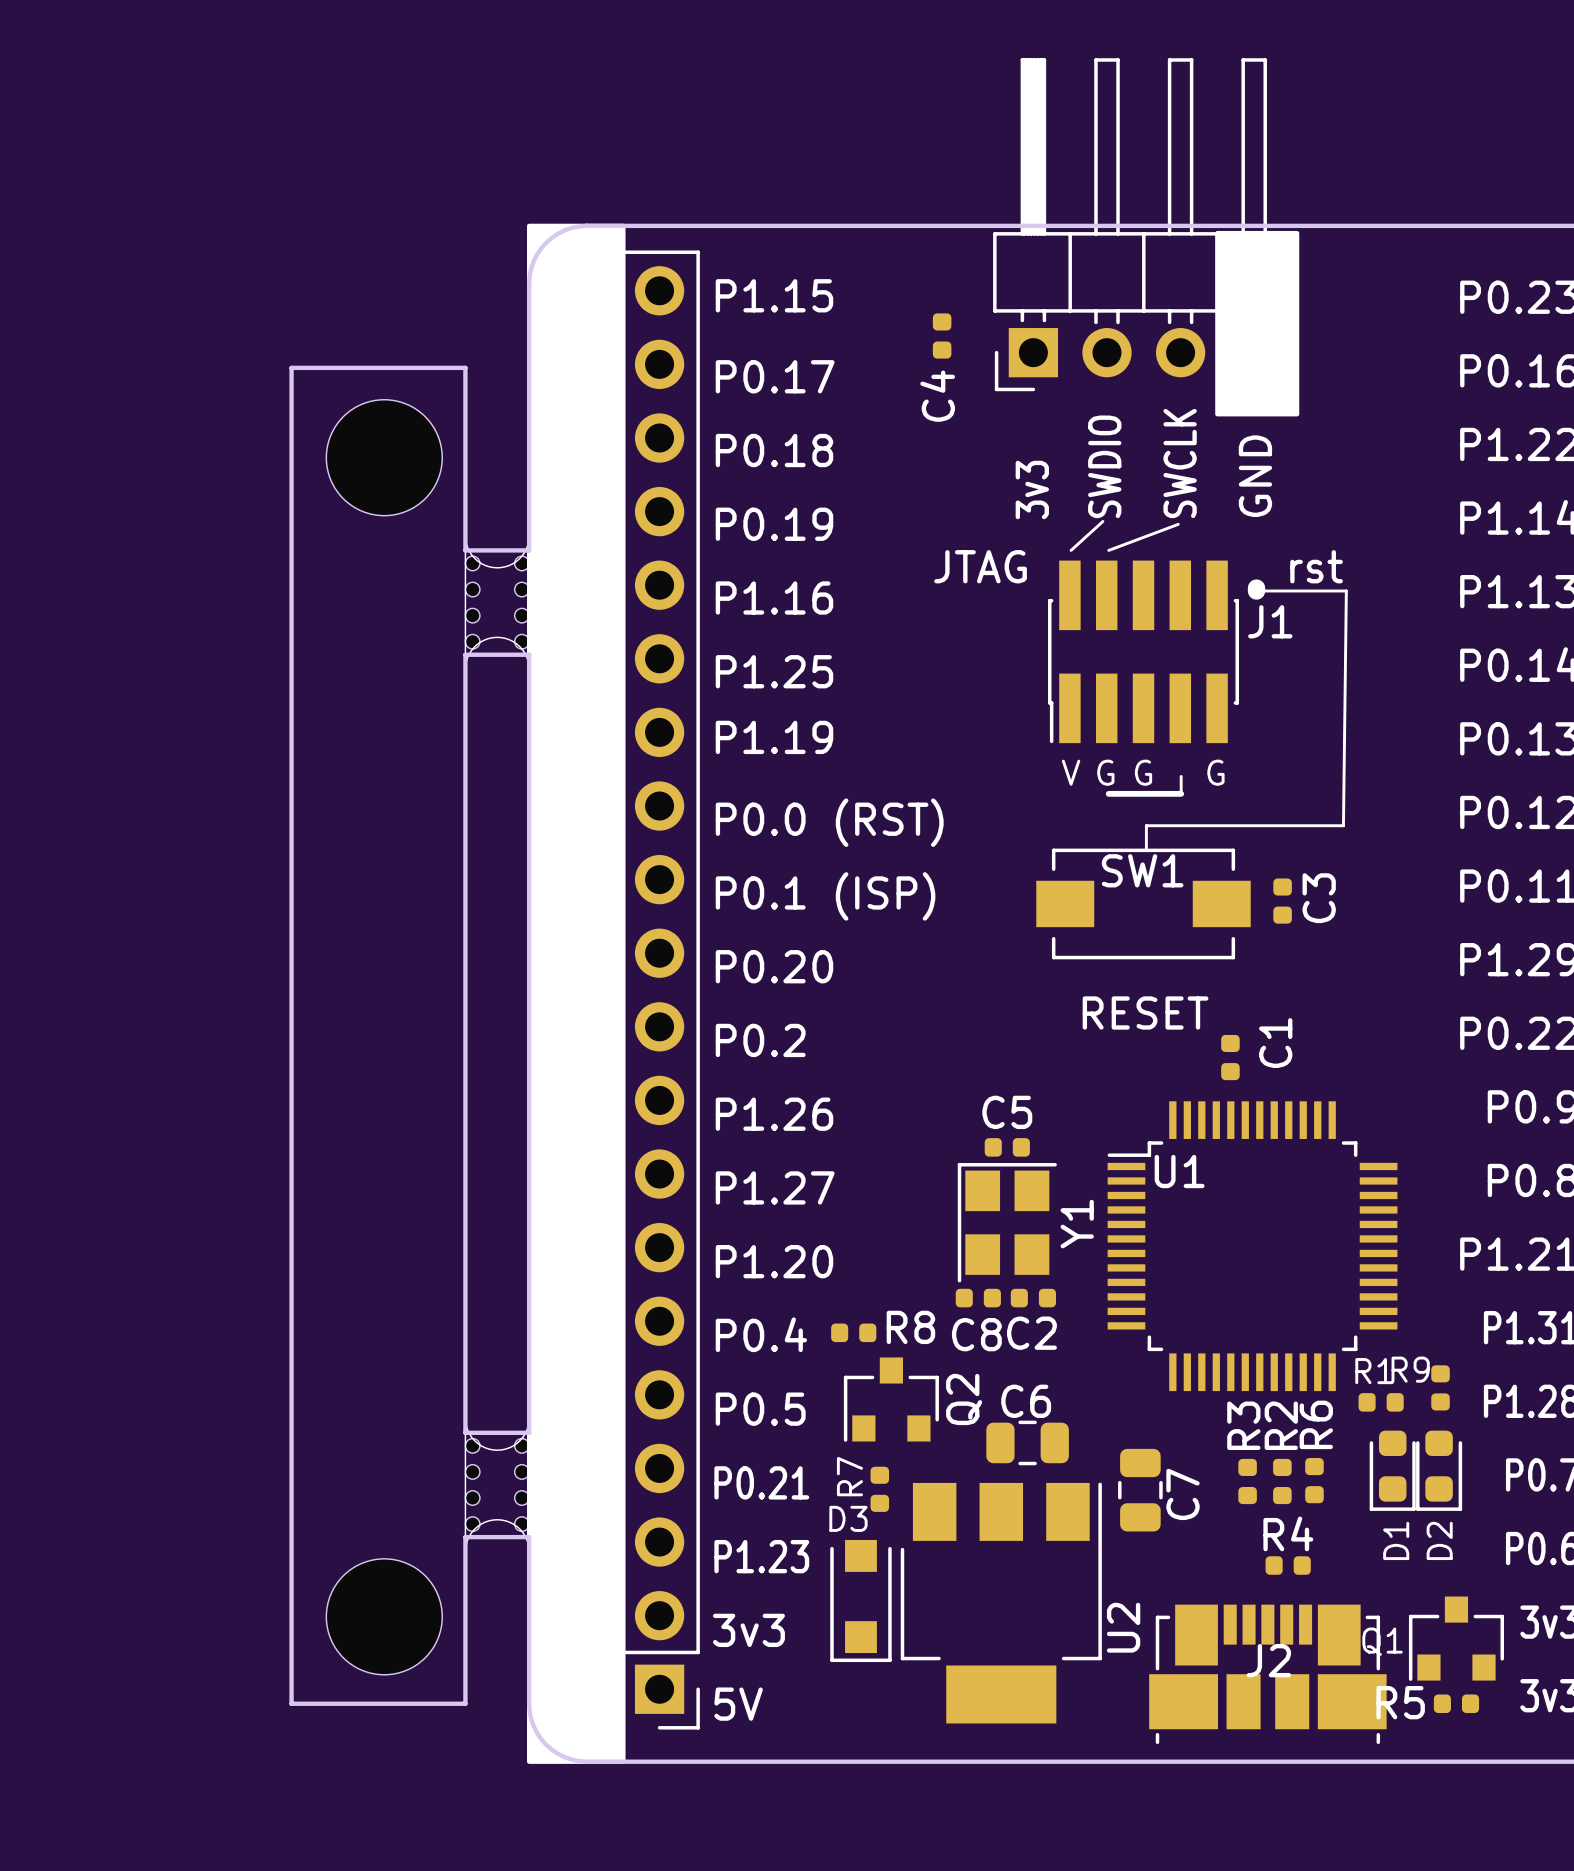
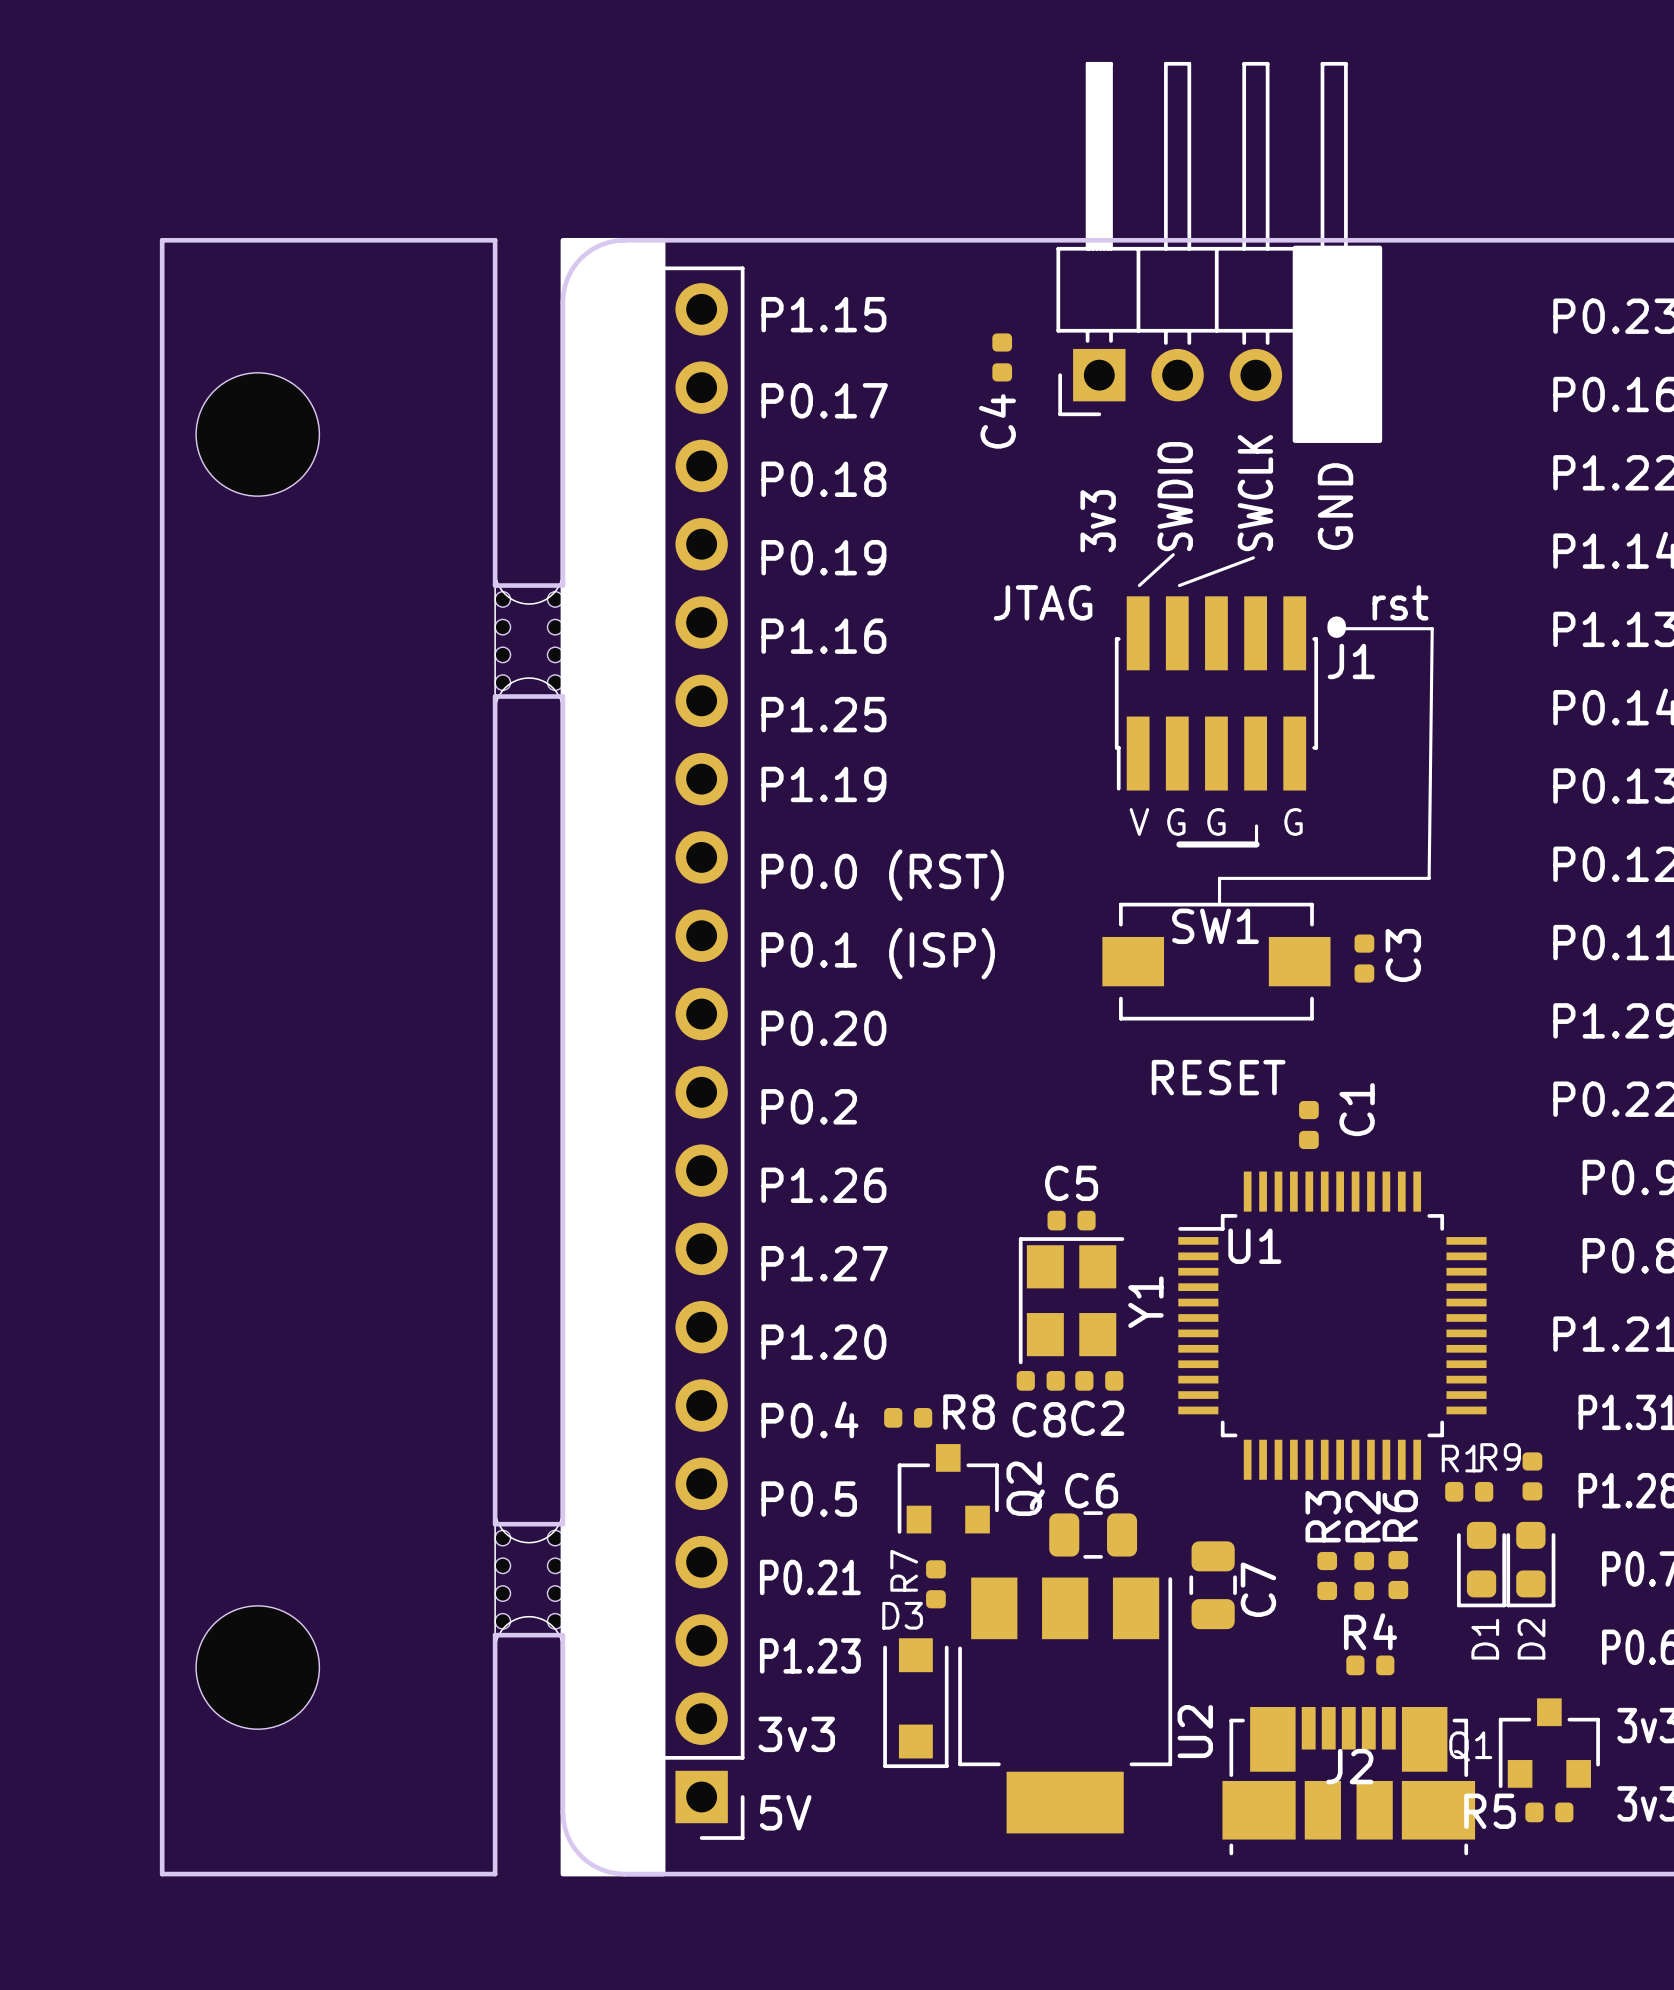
board edge: (465, 367) (291, 367) (291, 1703) (465, 1703) -> (495, 391) (495, 240) (162, 240) (162, 1874) (495, 1874) (495, 1812)
part position: (384, 457) -> (257, 434)
part position: (384, 1616) -> (257, 1667)

